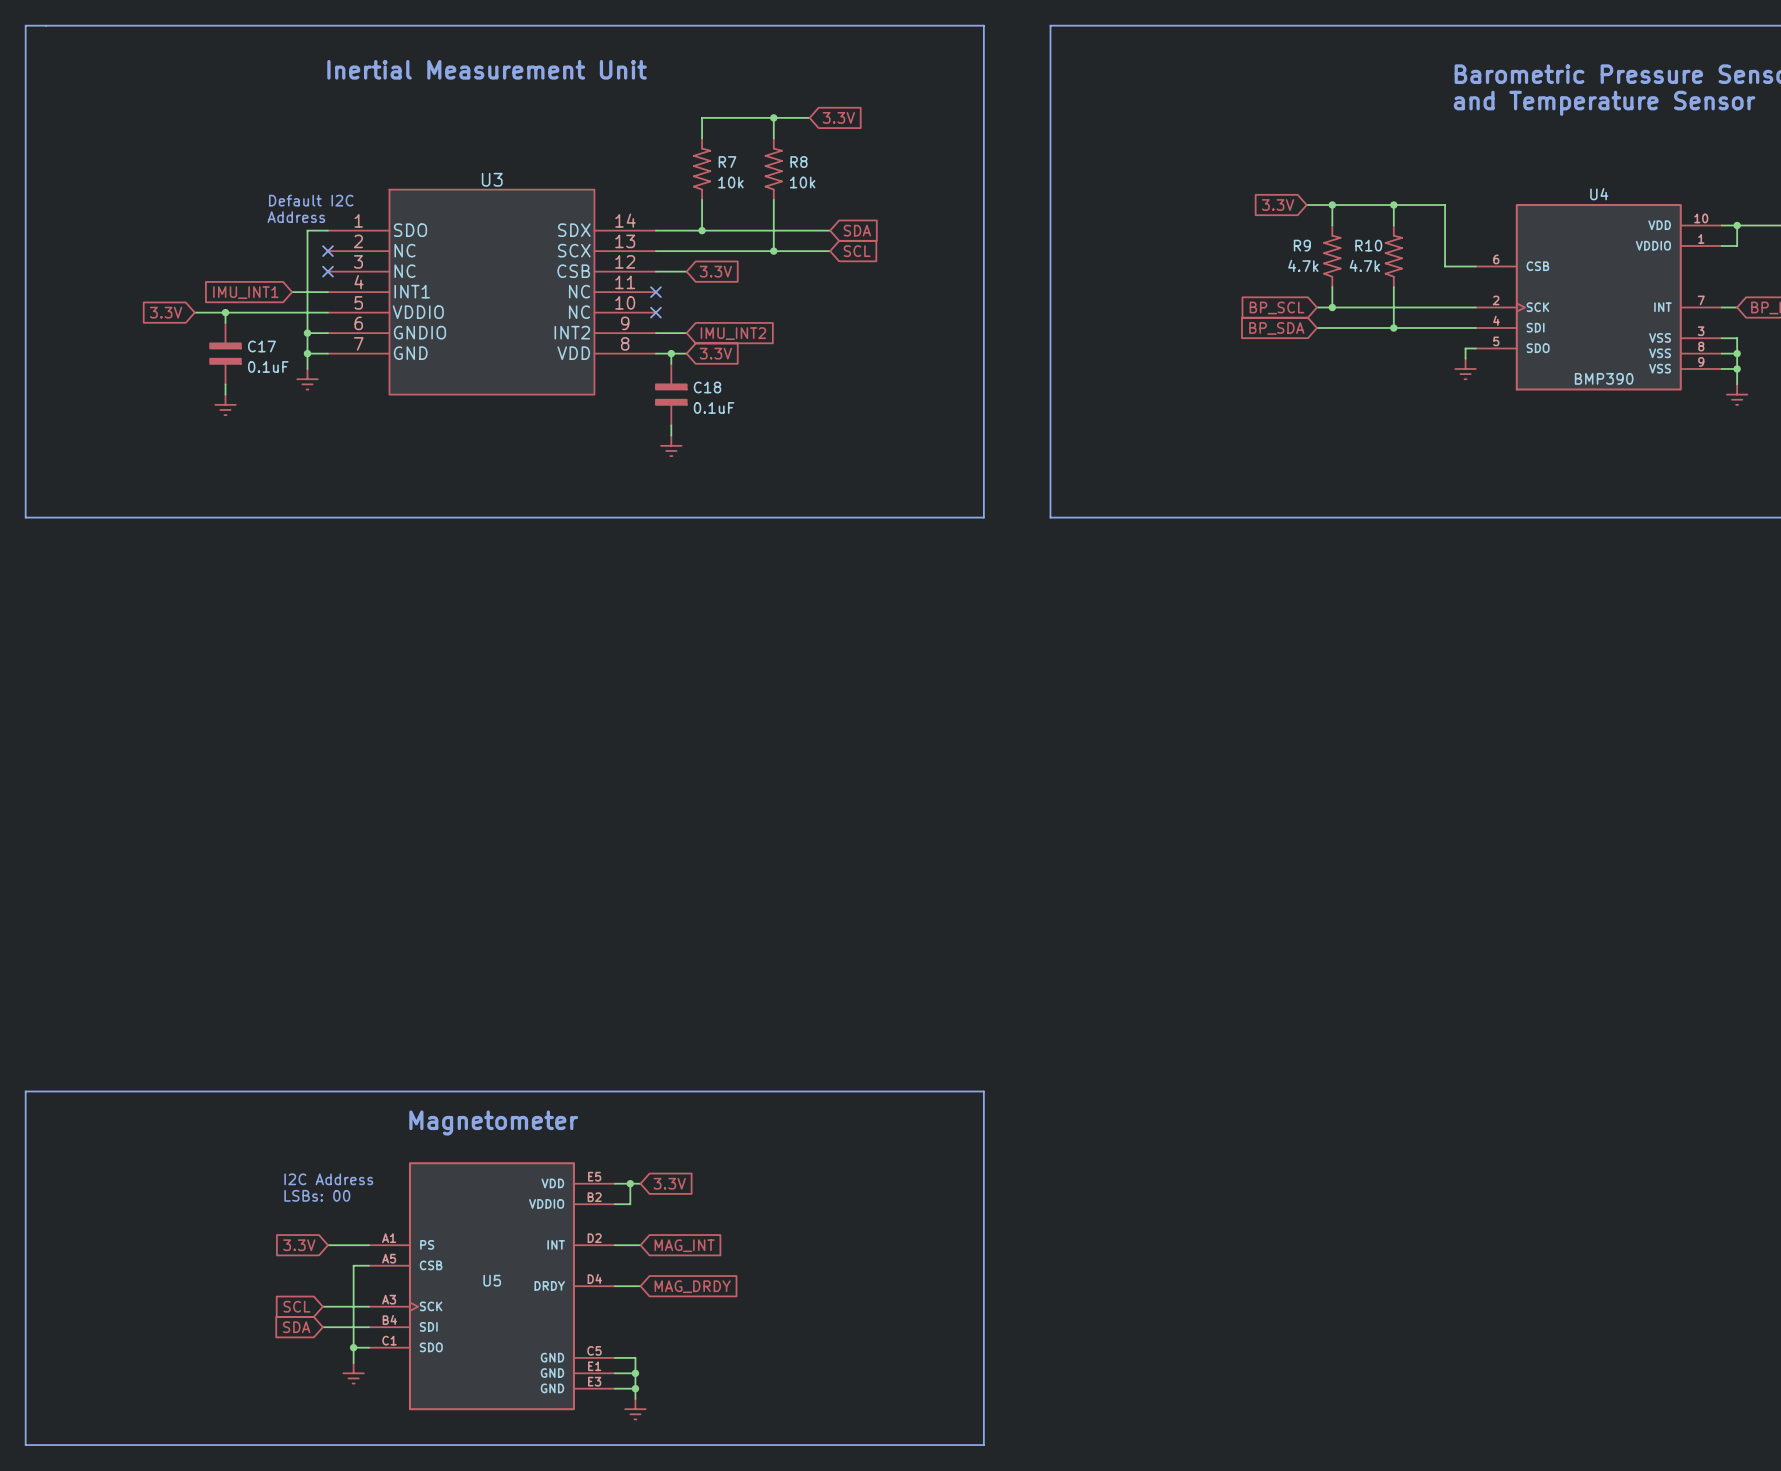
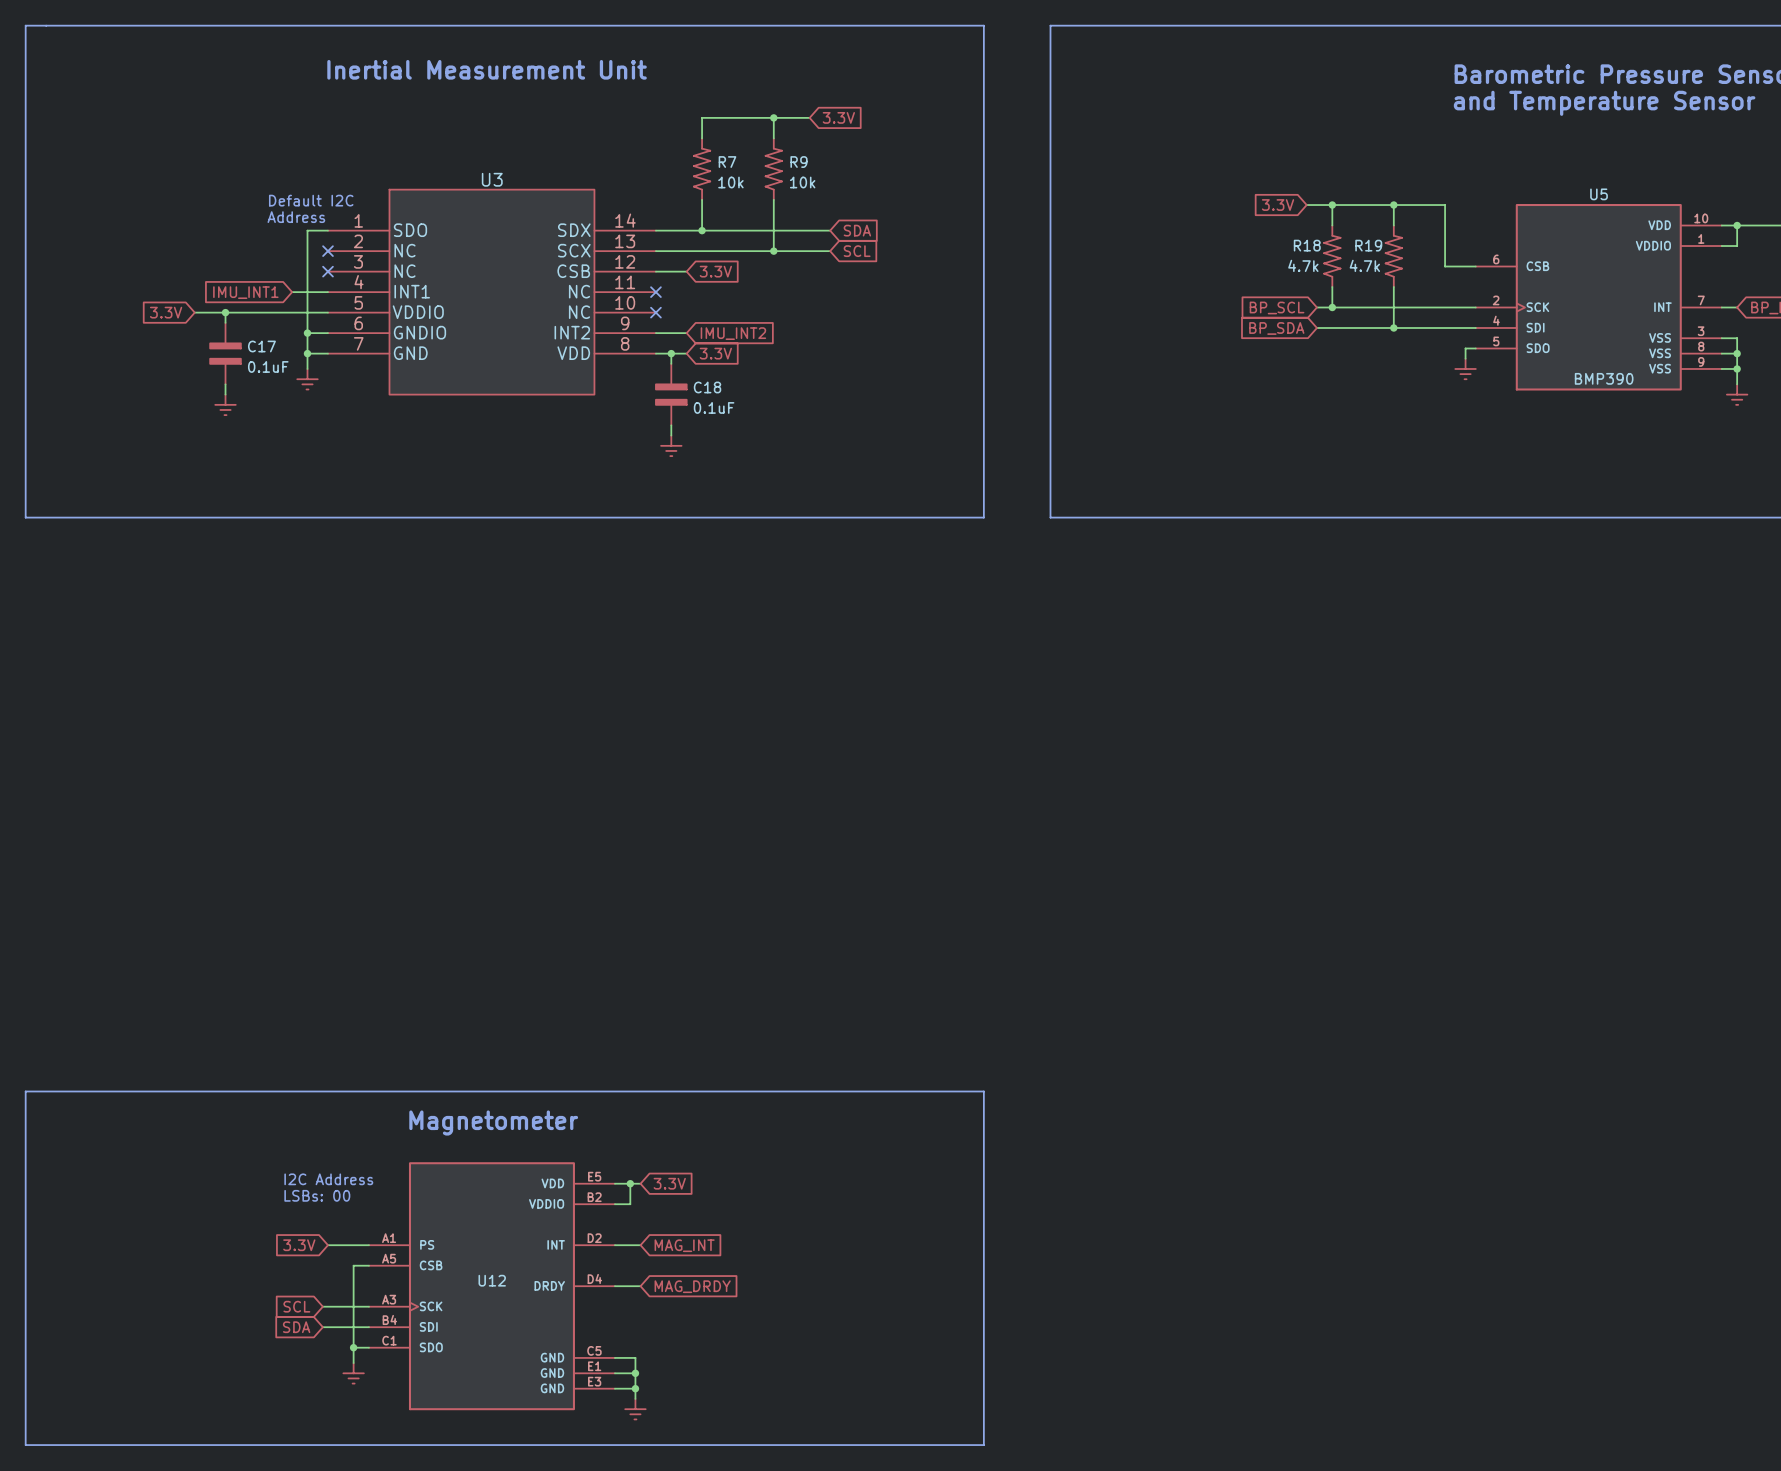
R8 name: R8 (798, 162) -> R9 (798, 162)
U4 name: U4 (1599, 194) -> U5 (1599, 194)
R9 name: R9 (1302, 245) -> R18 (1307, 245)
R10 name: R10 (1368, 245) -> R19 (1368, 245)
U5 name: U5 (492, 1280) -> U12 (492, 1280)

